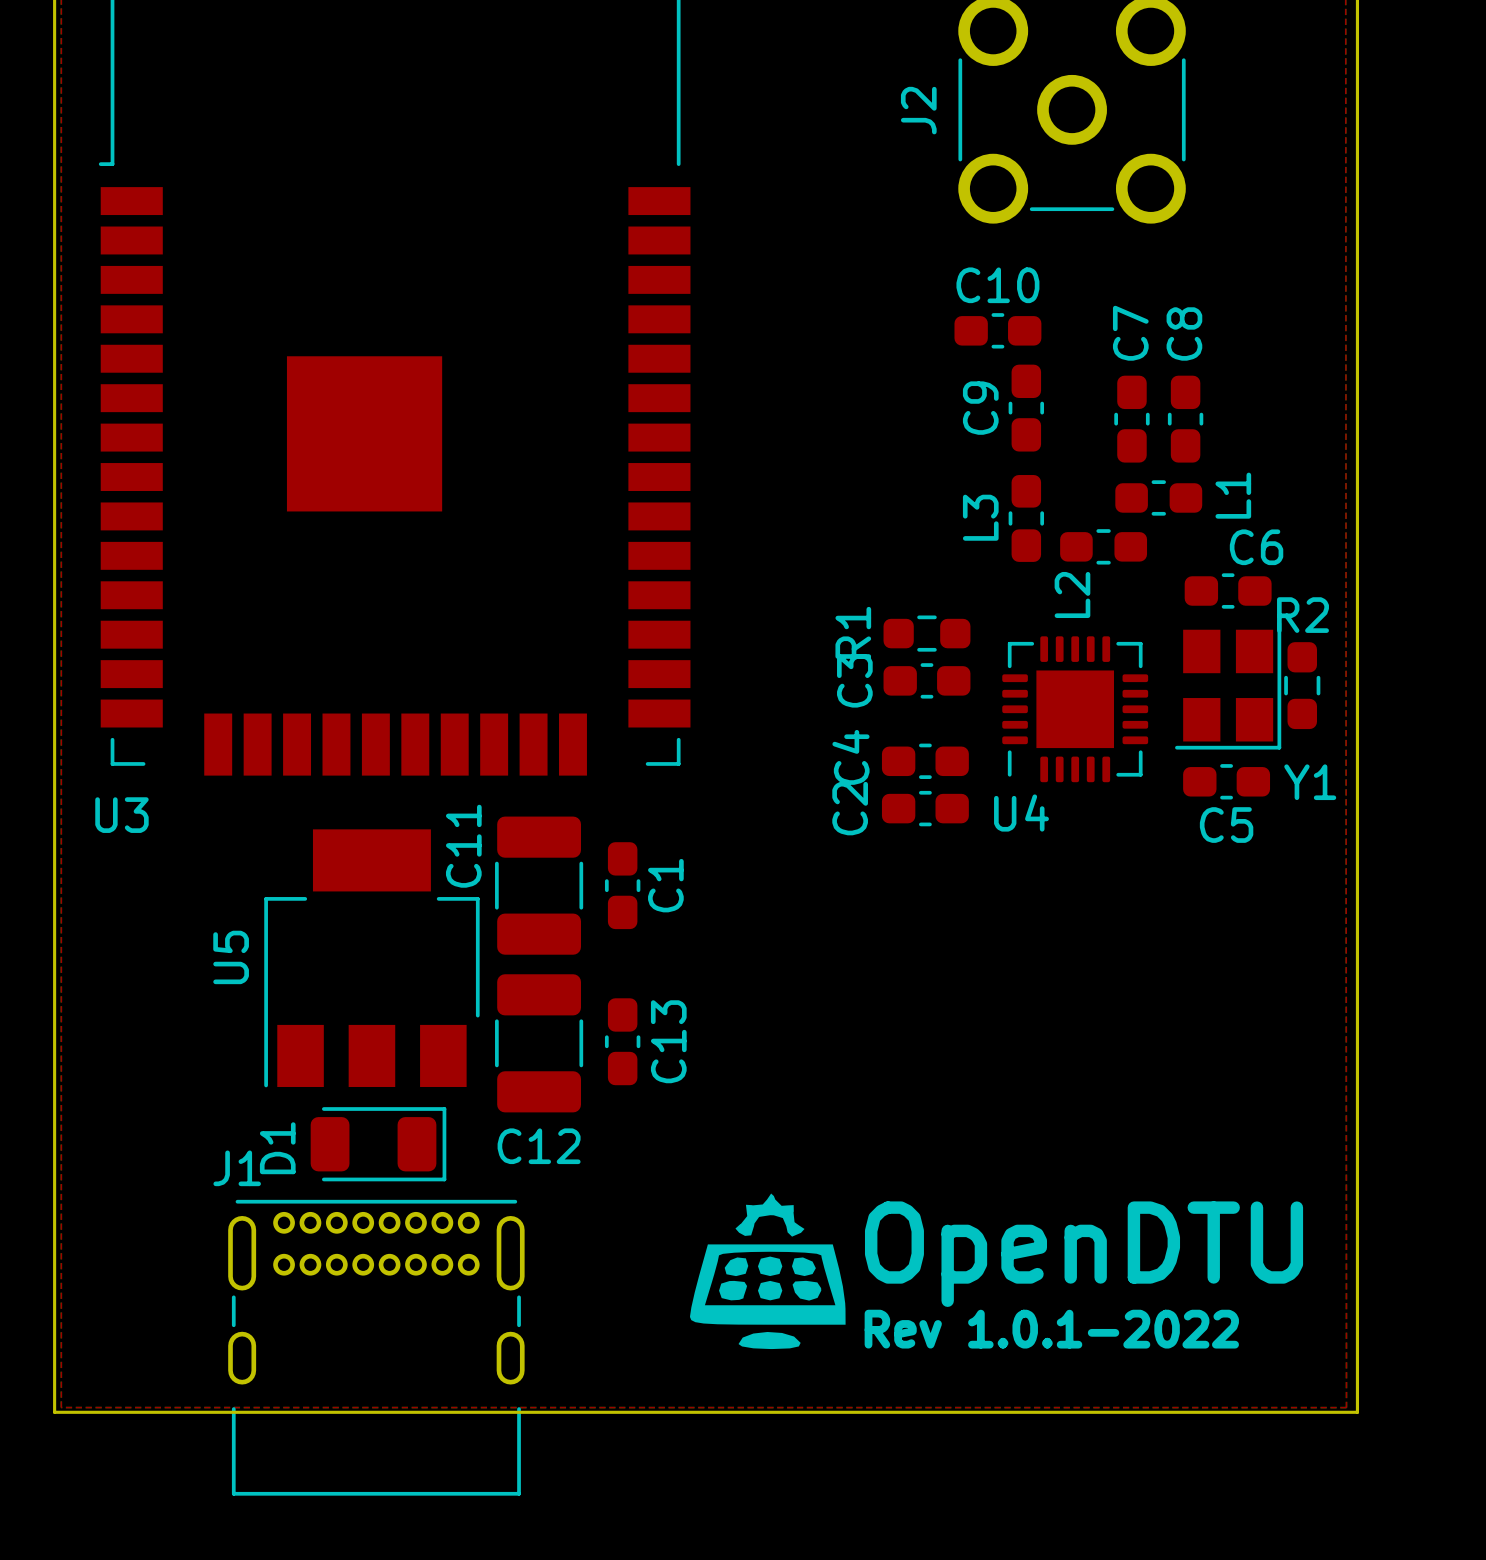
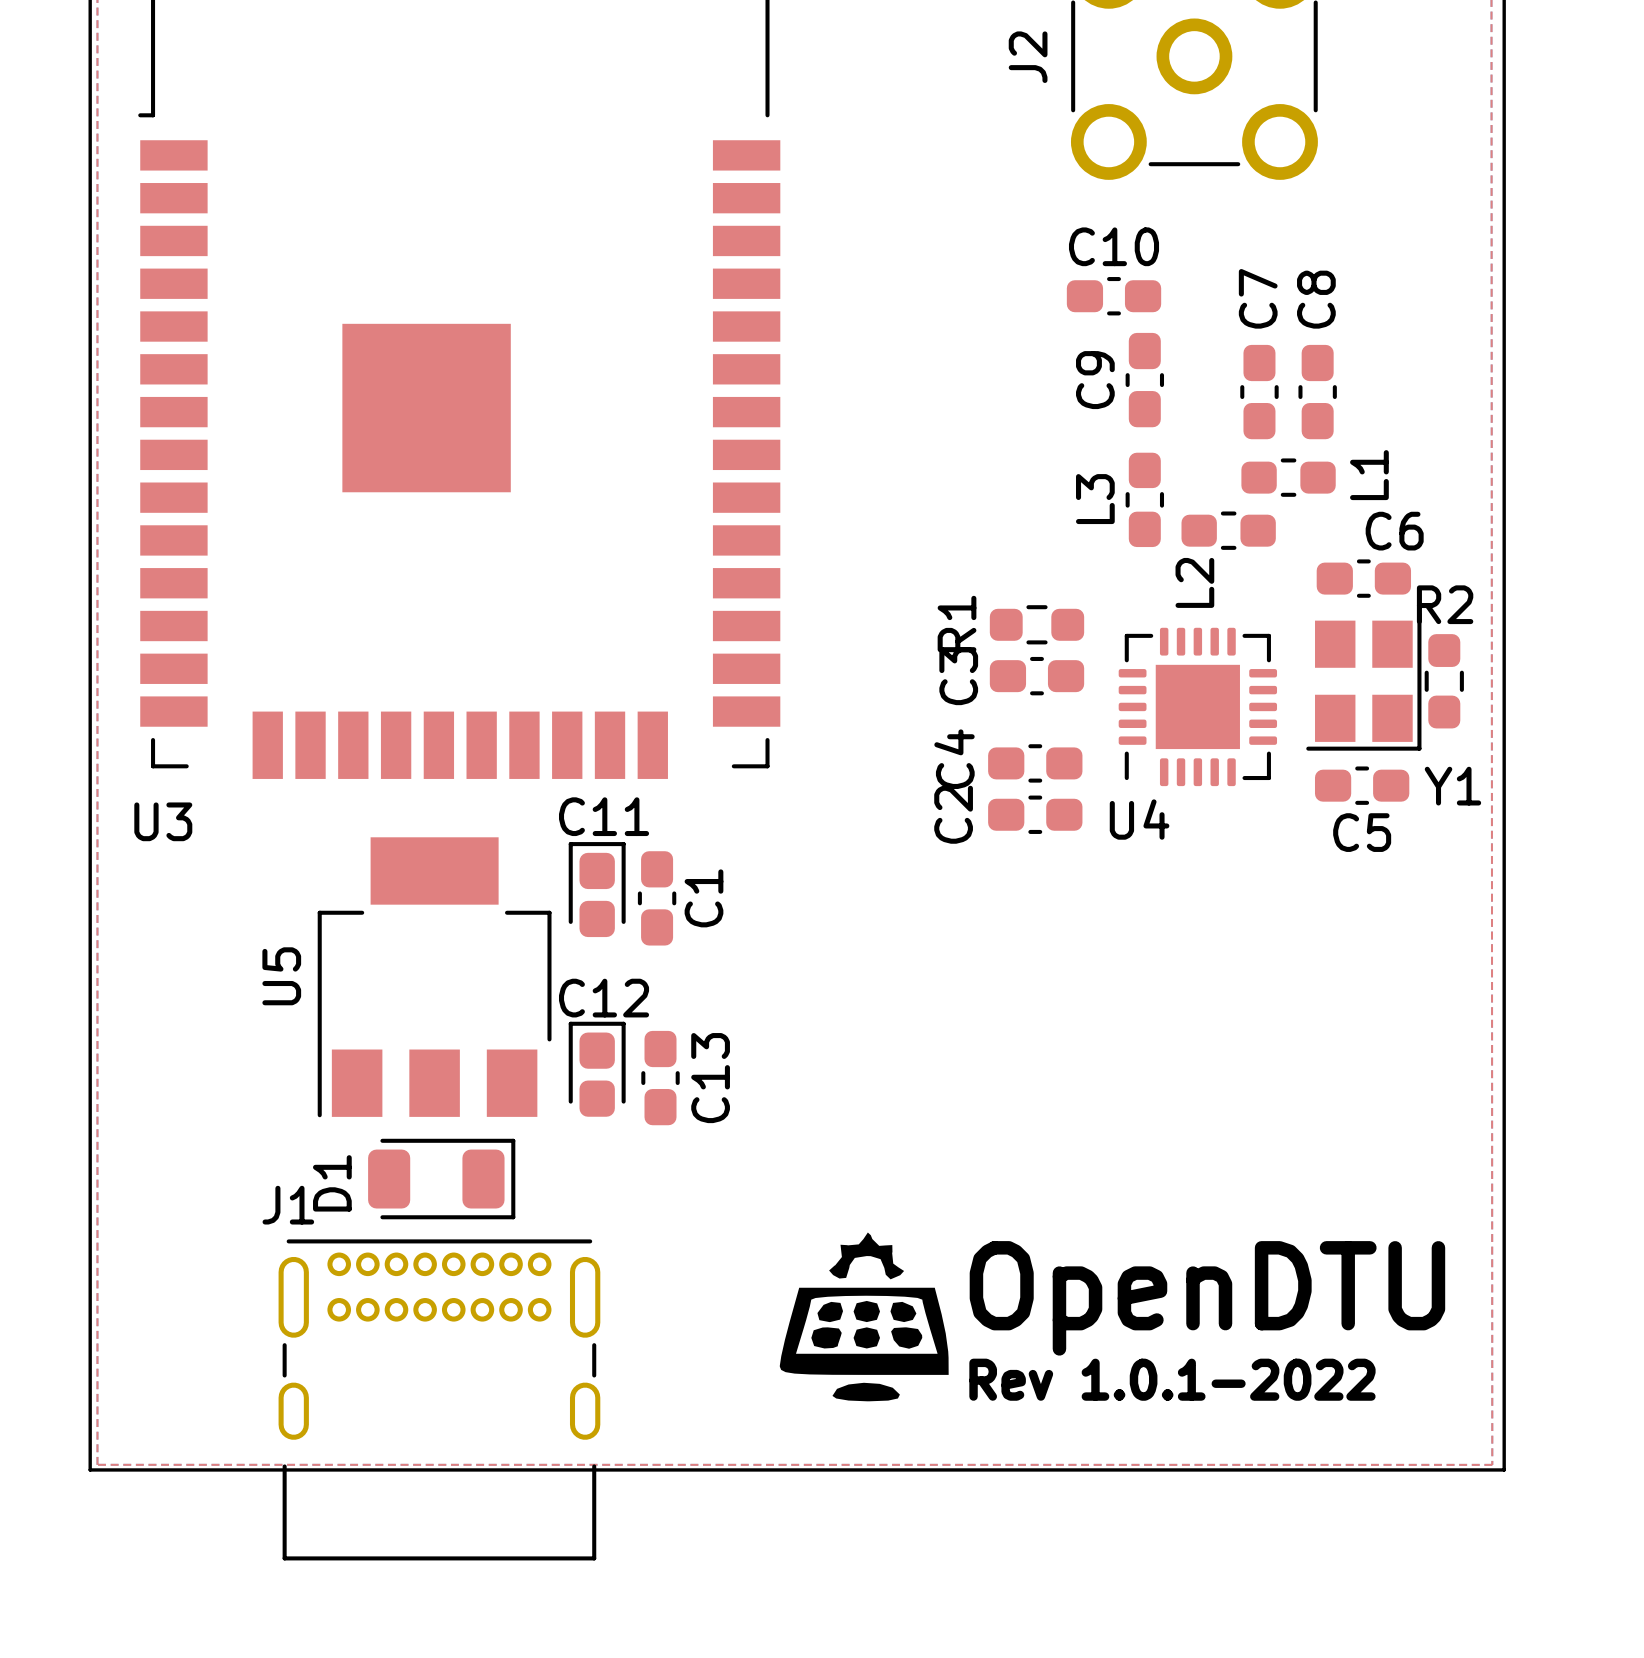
C11 footprint: [495, 816, 584, 955] -> [568, 842, 626, 938]
C11 name position: C11 (463, 846) -> C11 (604, 816)
C1 position: (622, 885) -> (657, 898)
C12 footprint: [495, 974, 584, 1113] -> [568, 1021, 626, 1117]
C13 position: (622, 1041) -> (660, 1078)
C12 name position: C12 (539, 1146) -> C12 (604, 998)

